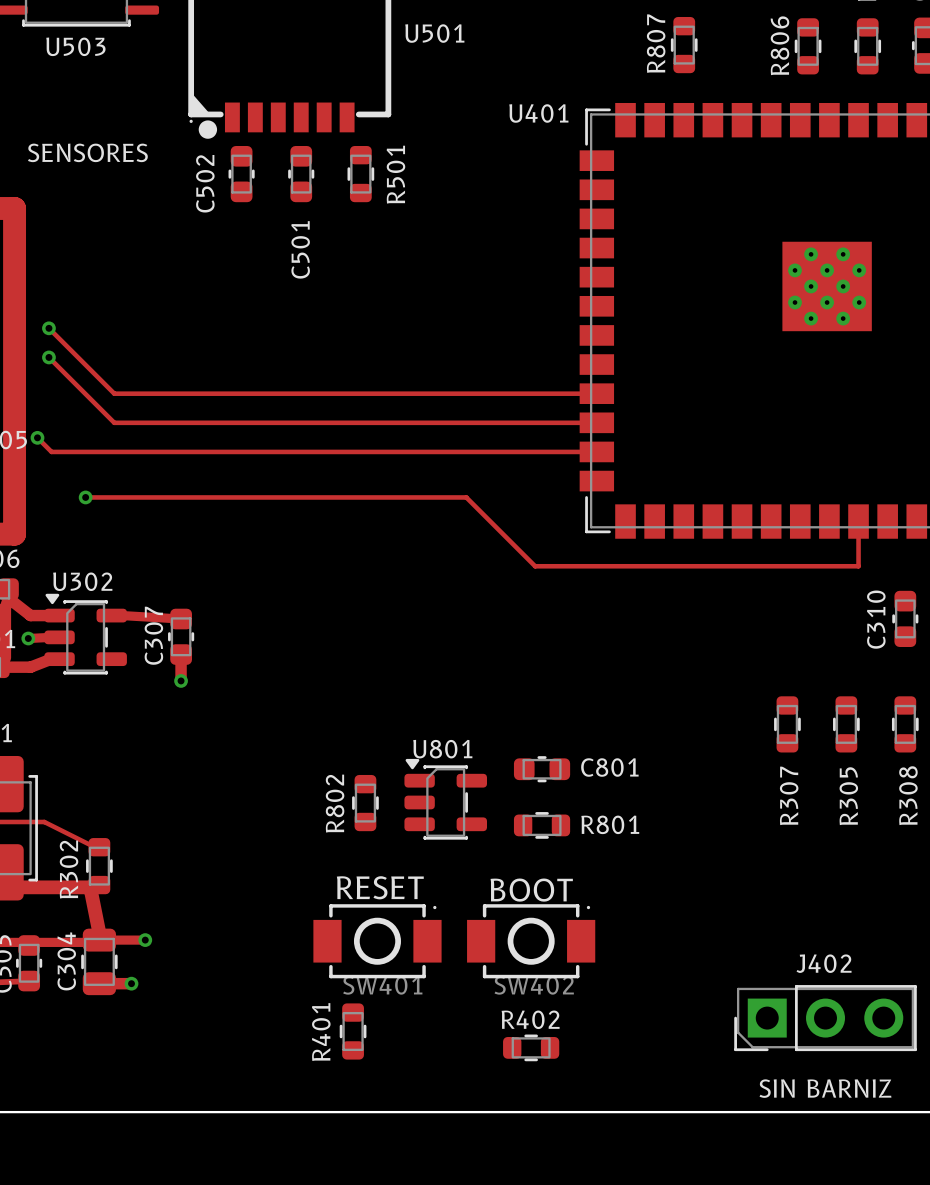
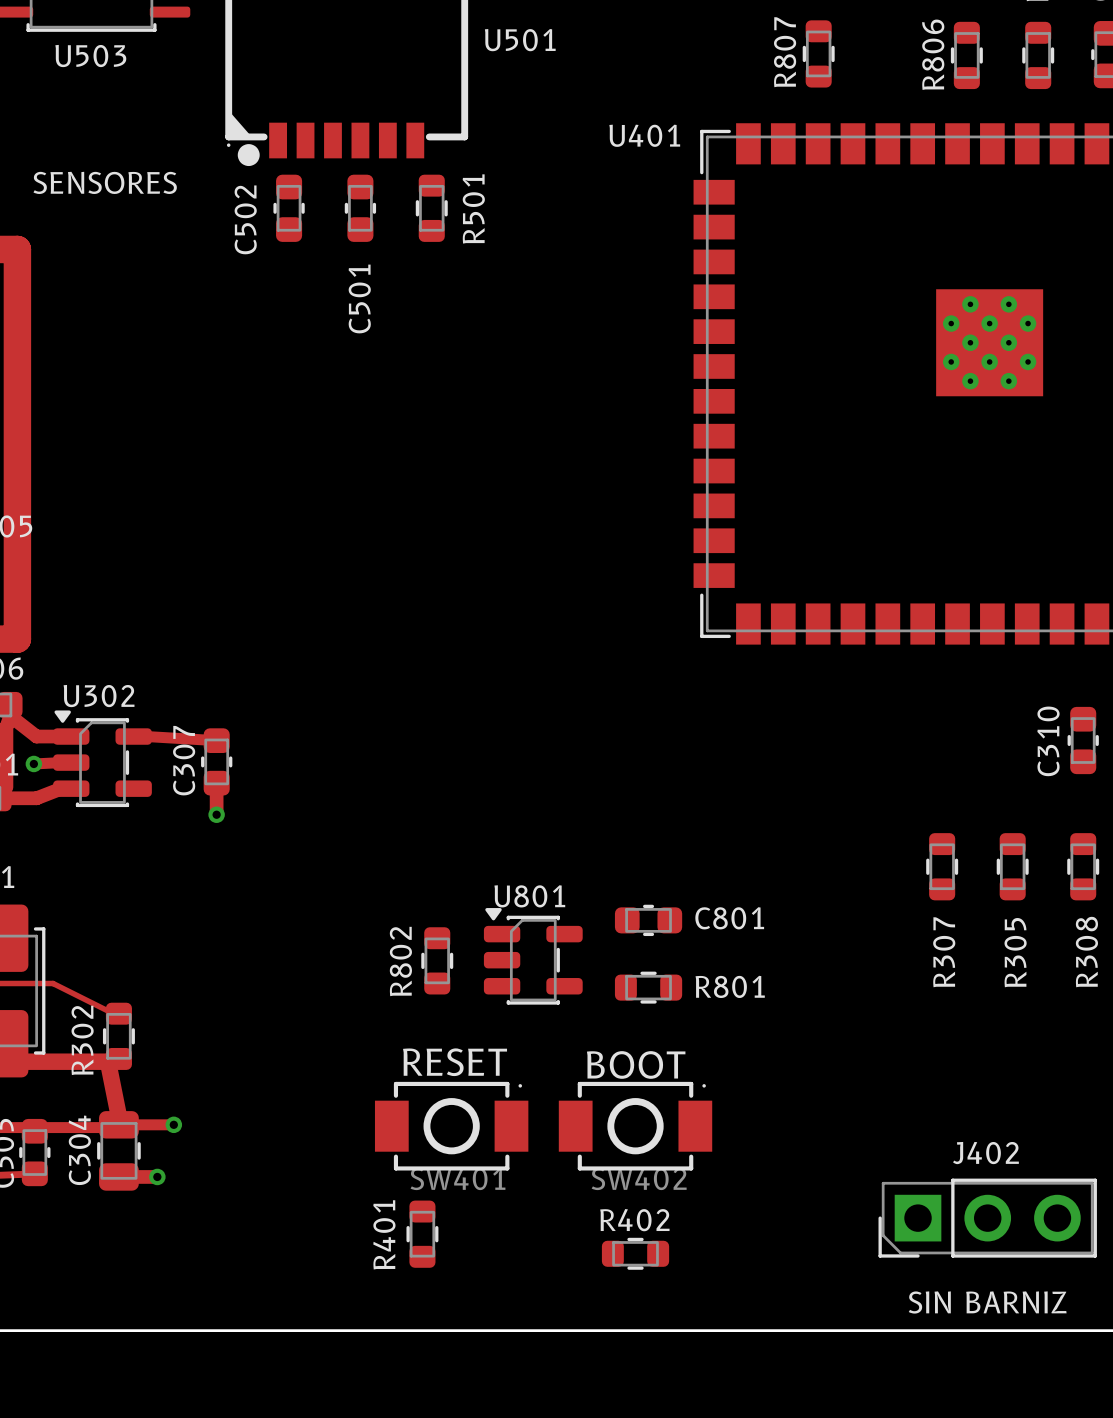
track: (48, 328) (114, 393) (596, 393) -> none
via: (48, 328) -> none
track: (48, 357) (114, 422) (596, 422) -> none
via: (48, 357) -> none
track: (37, 437) (51, 451) (596, 451) -> none
via: (37, 437) -> none
track: (85, 497) (466, 497) (535, 566) (858, 566) (858, 521) -> none
via: (85, 497) -> none

